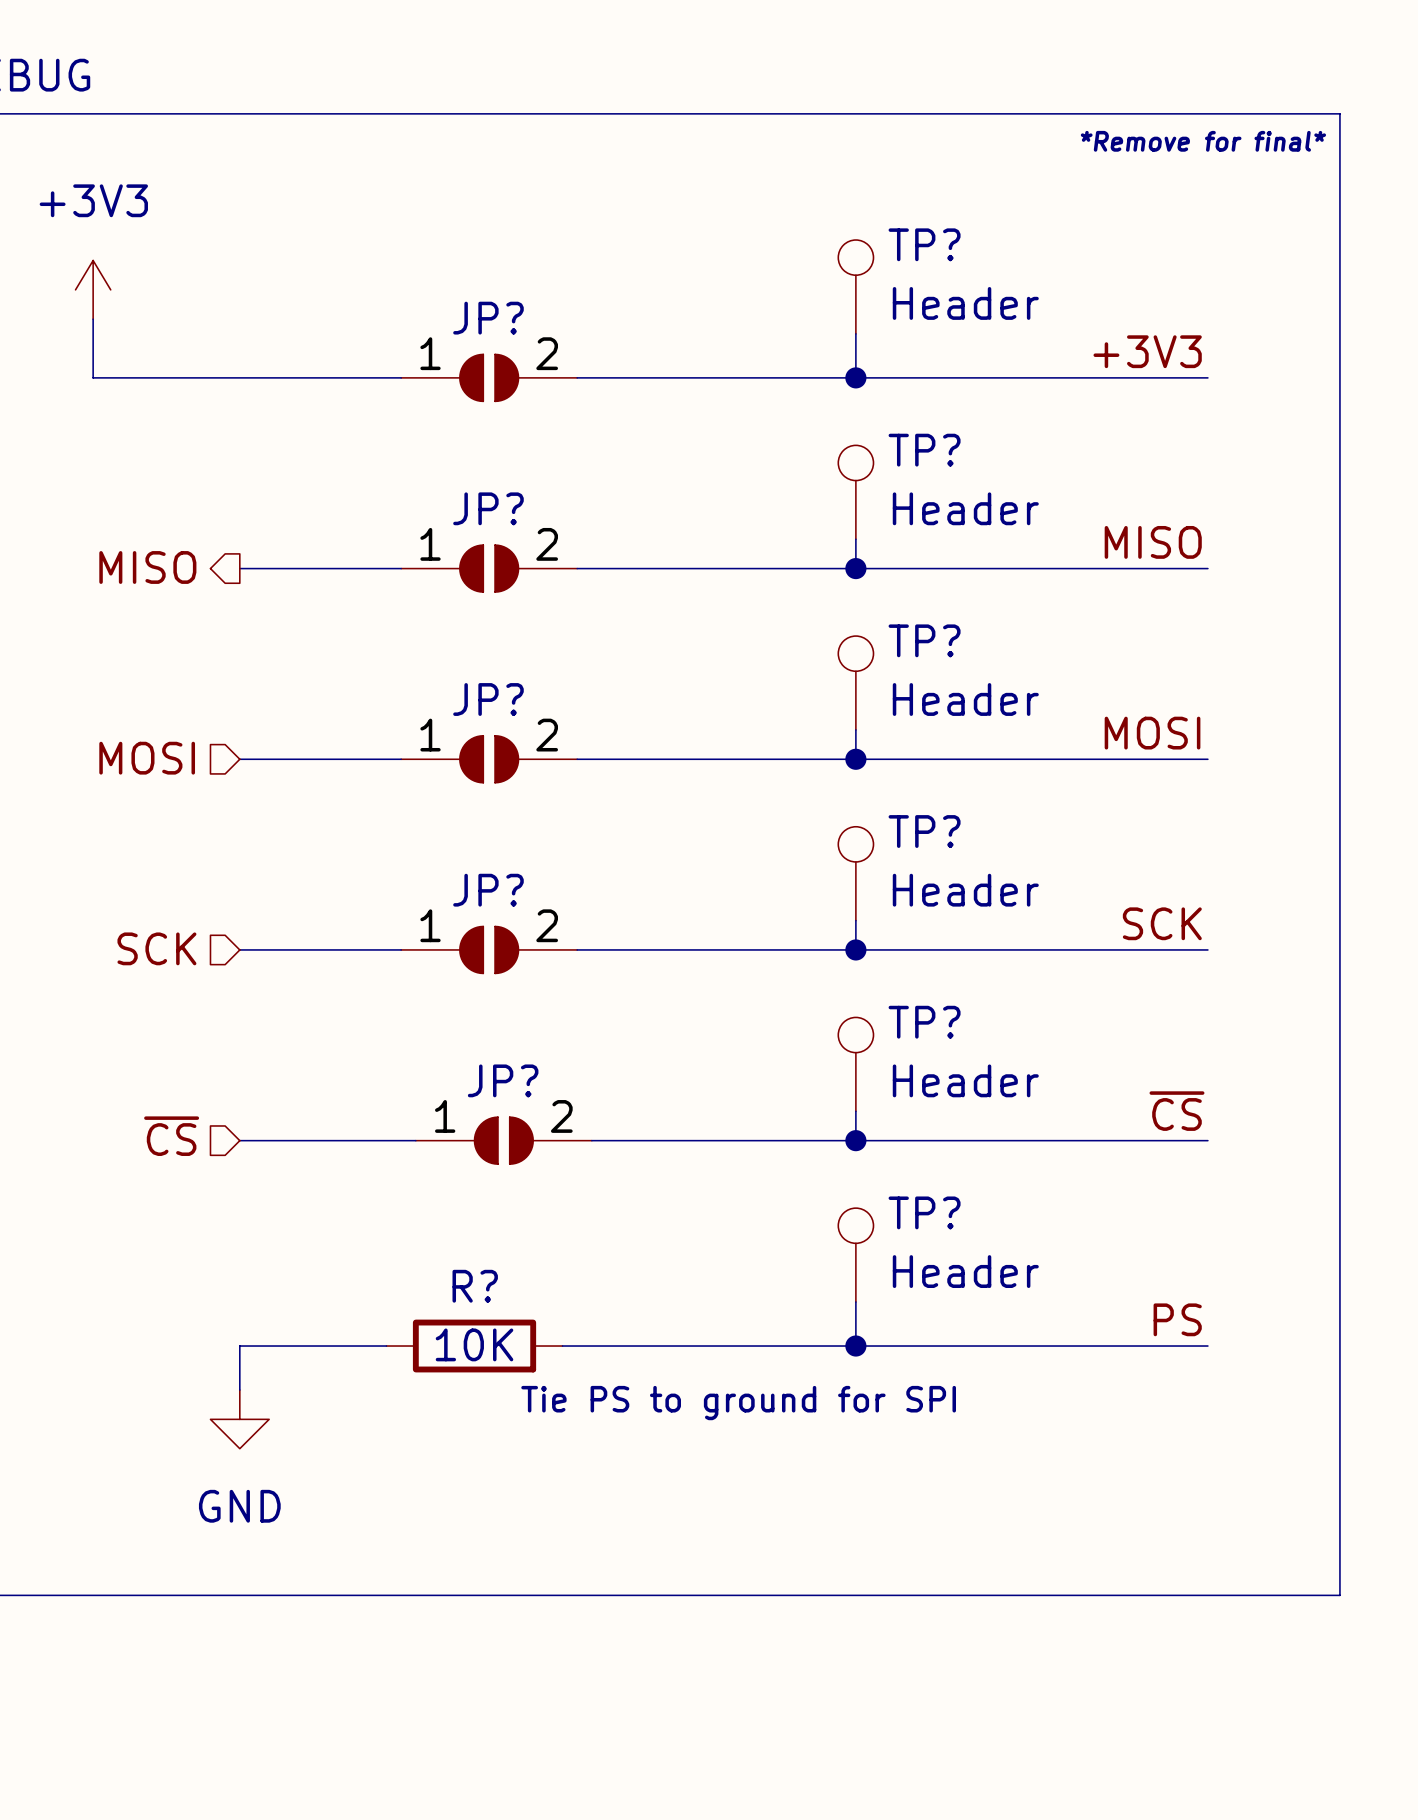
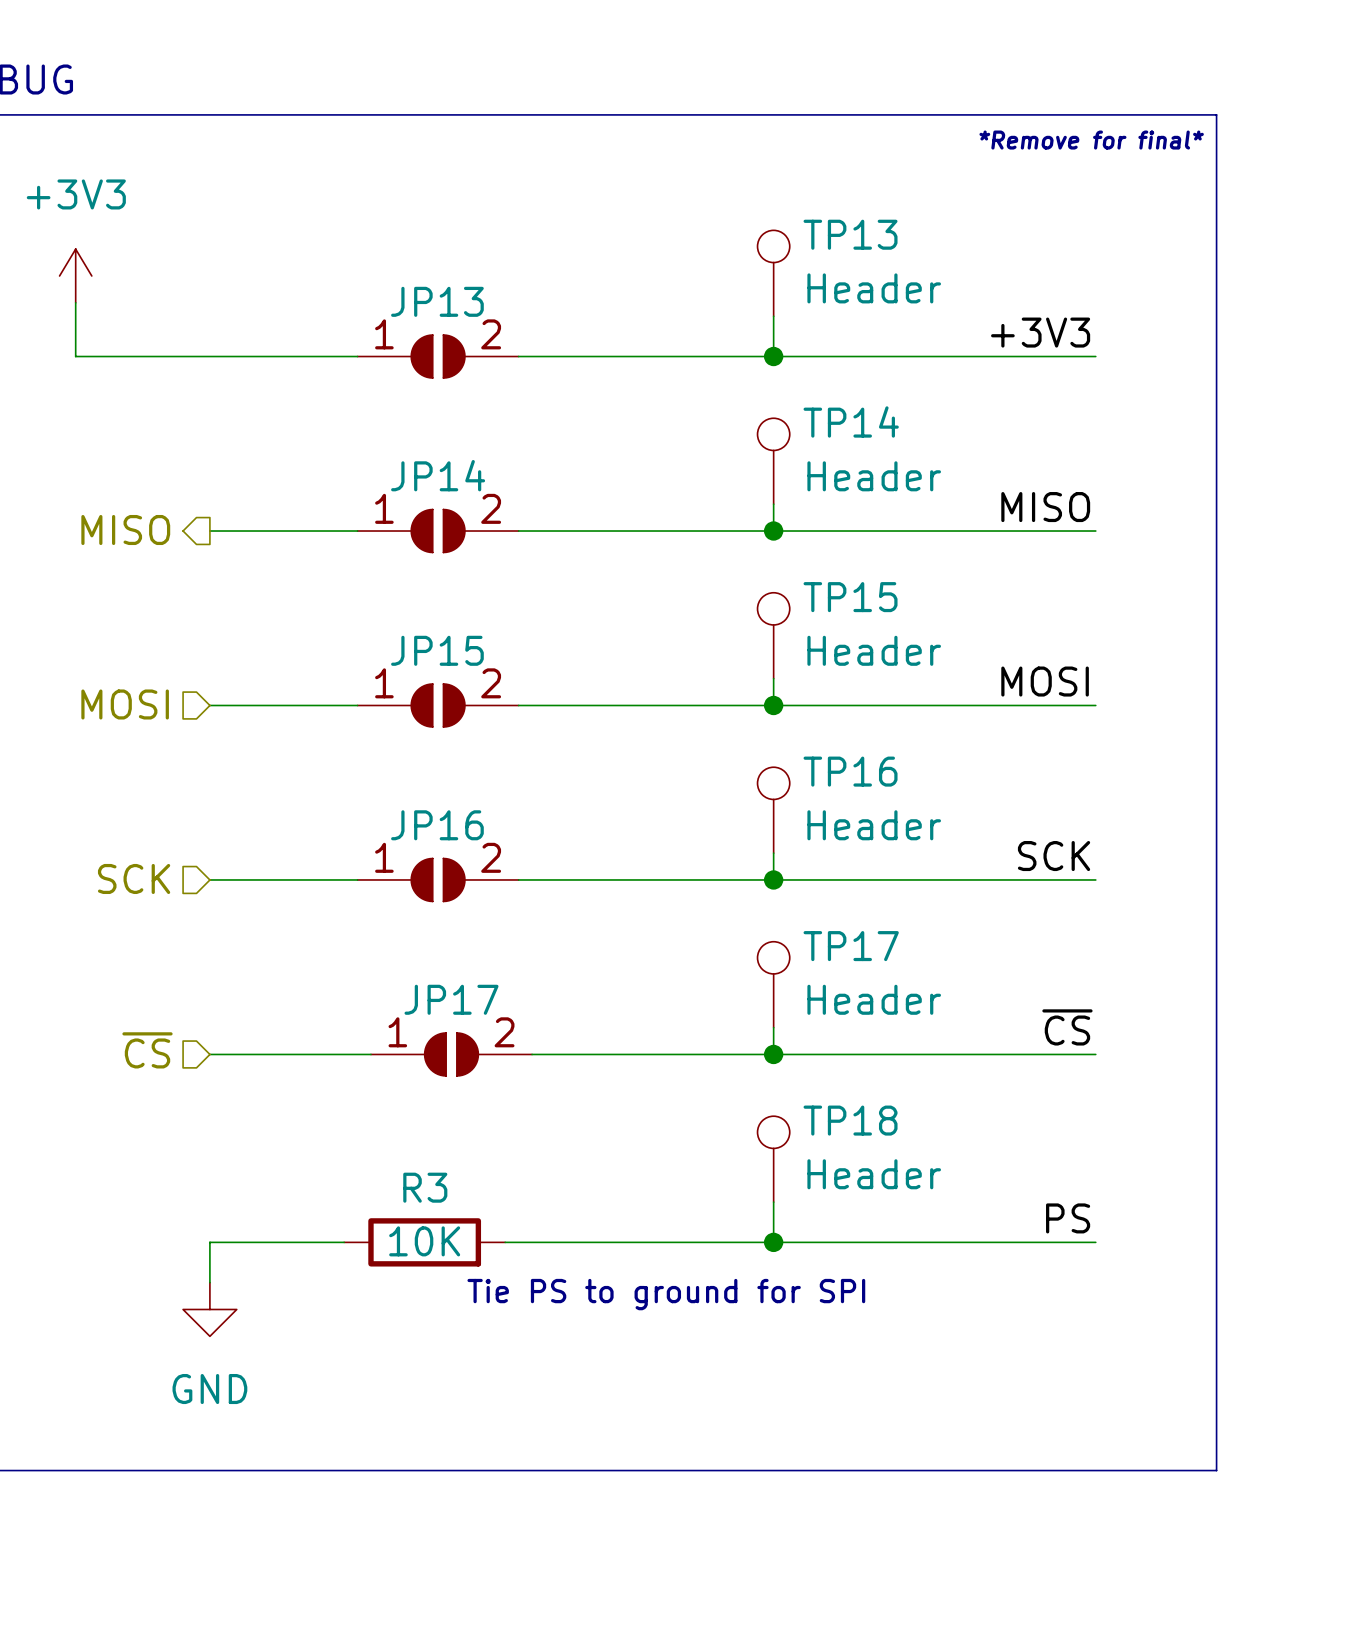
TP? name: TP? (924, 244) -> TP13 (850, 234)
JP? name: JP? (488, 318) -> JP13 (437, 301)
TP? name: TP? (924, 450) -> TP14 (851, 421)
JP? name: JP? (488, 508) -> JP14 (438, 475)
TP? name: TP? (924, 640) -> TP15 (850, 597)
JP? name: JP? (488, 699) -> JP15 (437, 650)
TP? name: TP? (924, 831) -> TP16 (850, 771)
JP? name: JP? (488, 890) -> JP16 (437, 825)
TP? name: TP? (924, 1022) -> TP17 (851, 946)
JP? name: JP? (503, 1080) -> JP17 (451, 999)
TP? name: TP? (924, 1212) -> TP18 (850, 1120)
R? name: R? (475, 1286) -> R3 (425, 1187)

